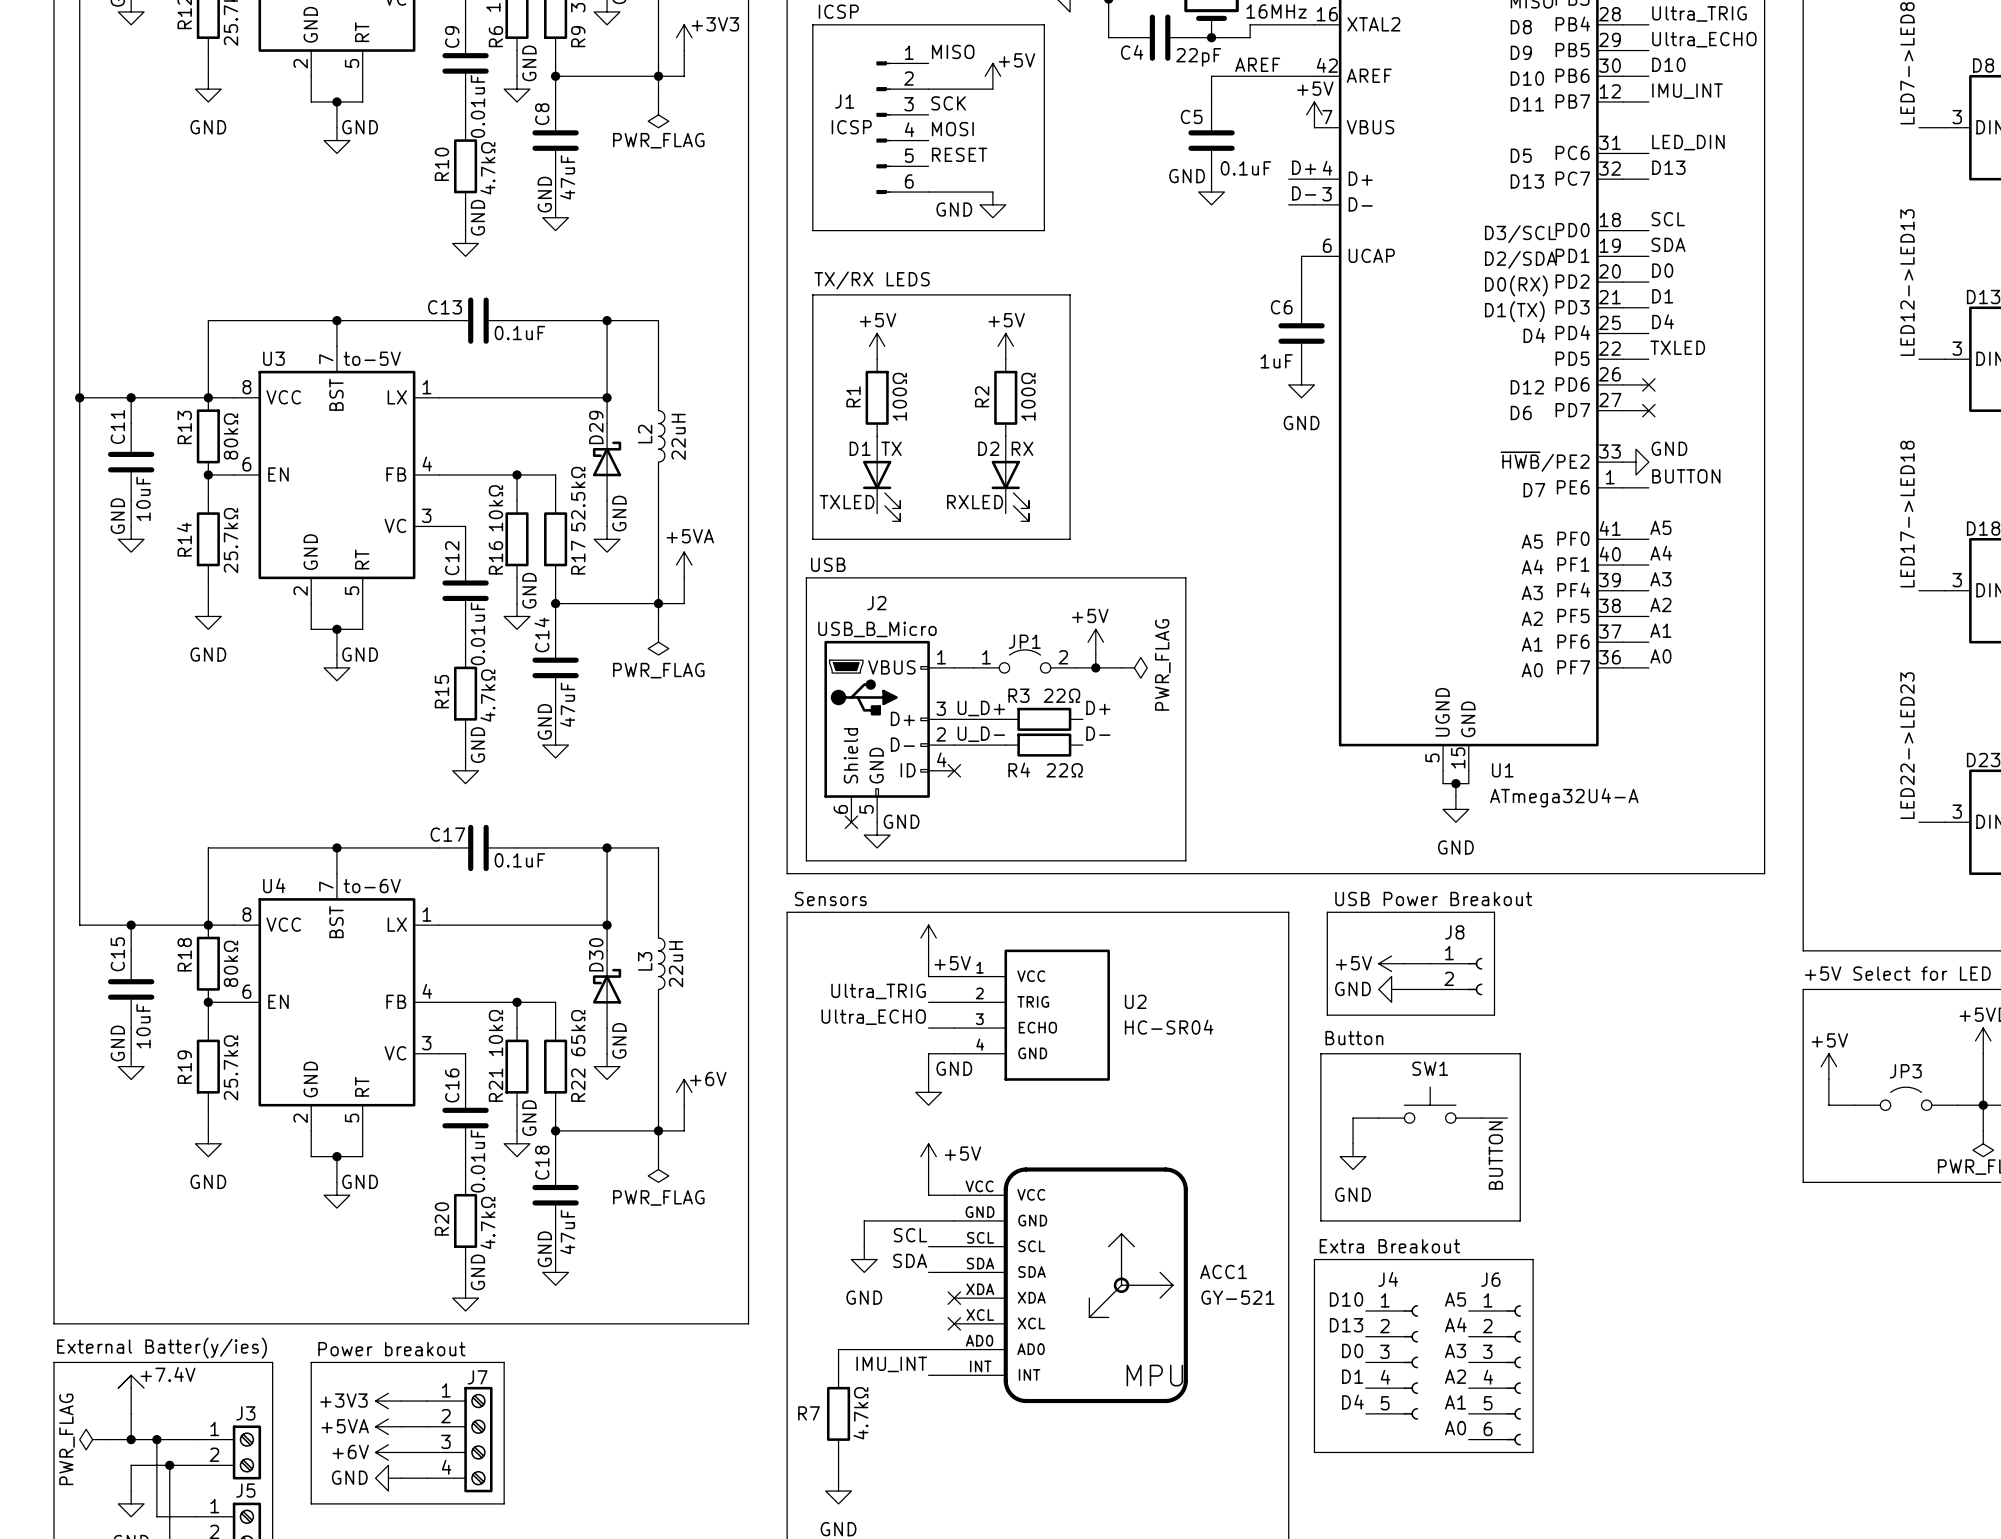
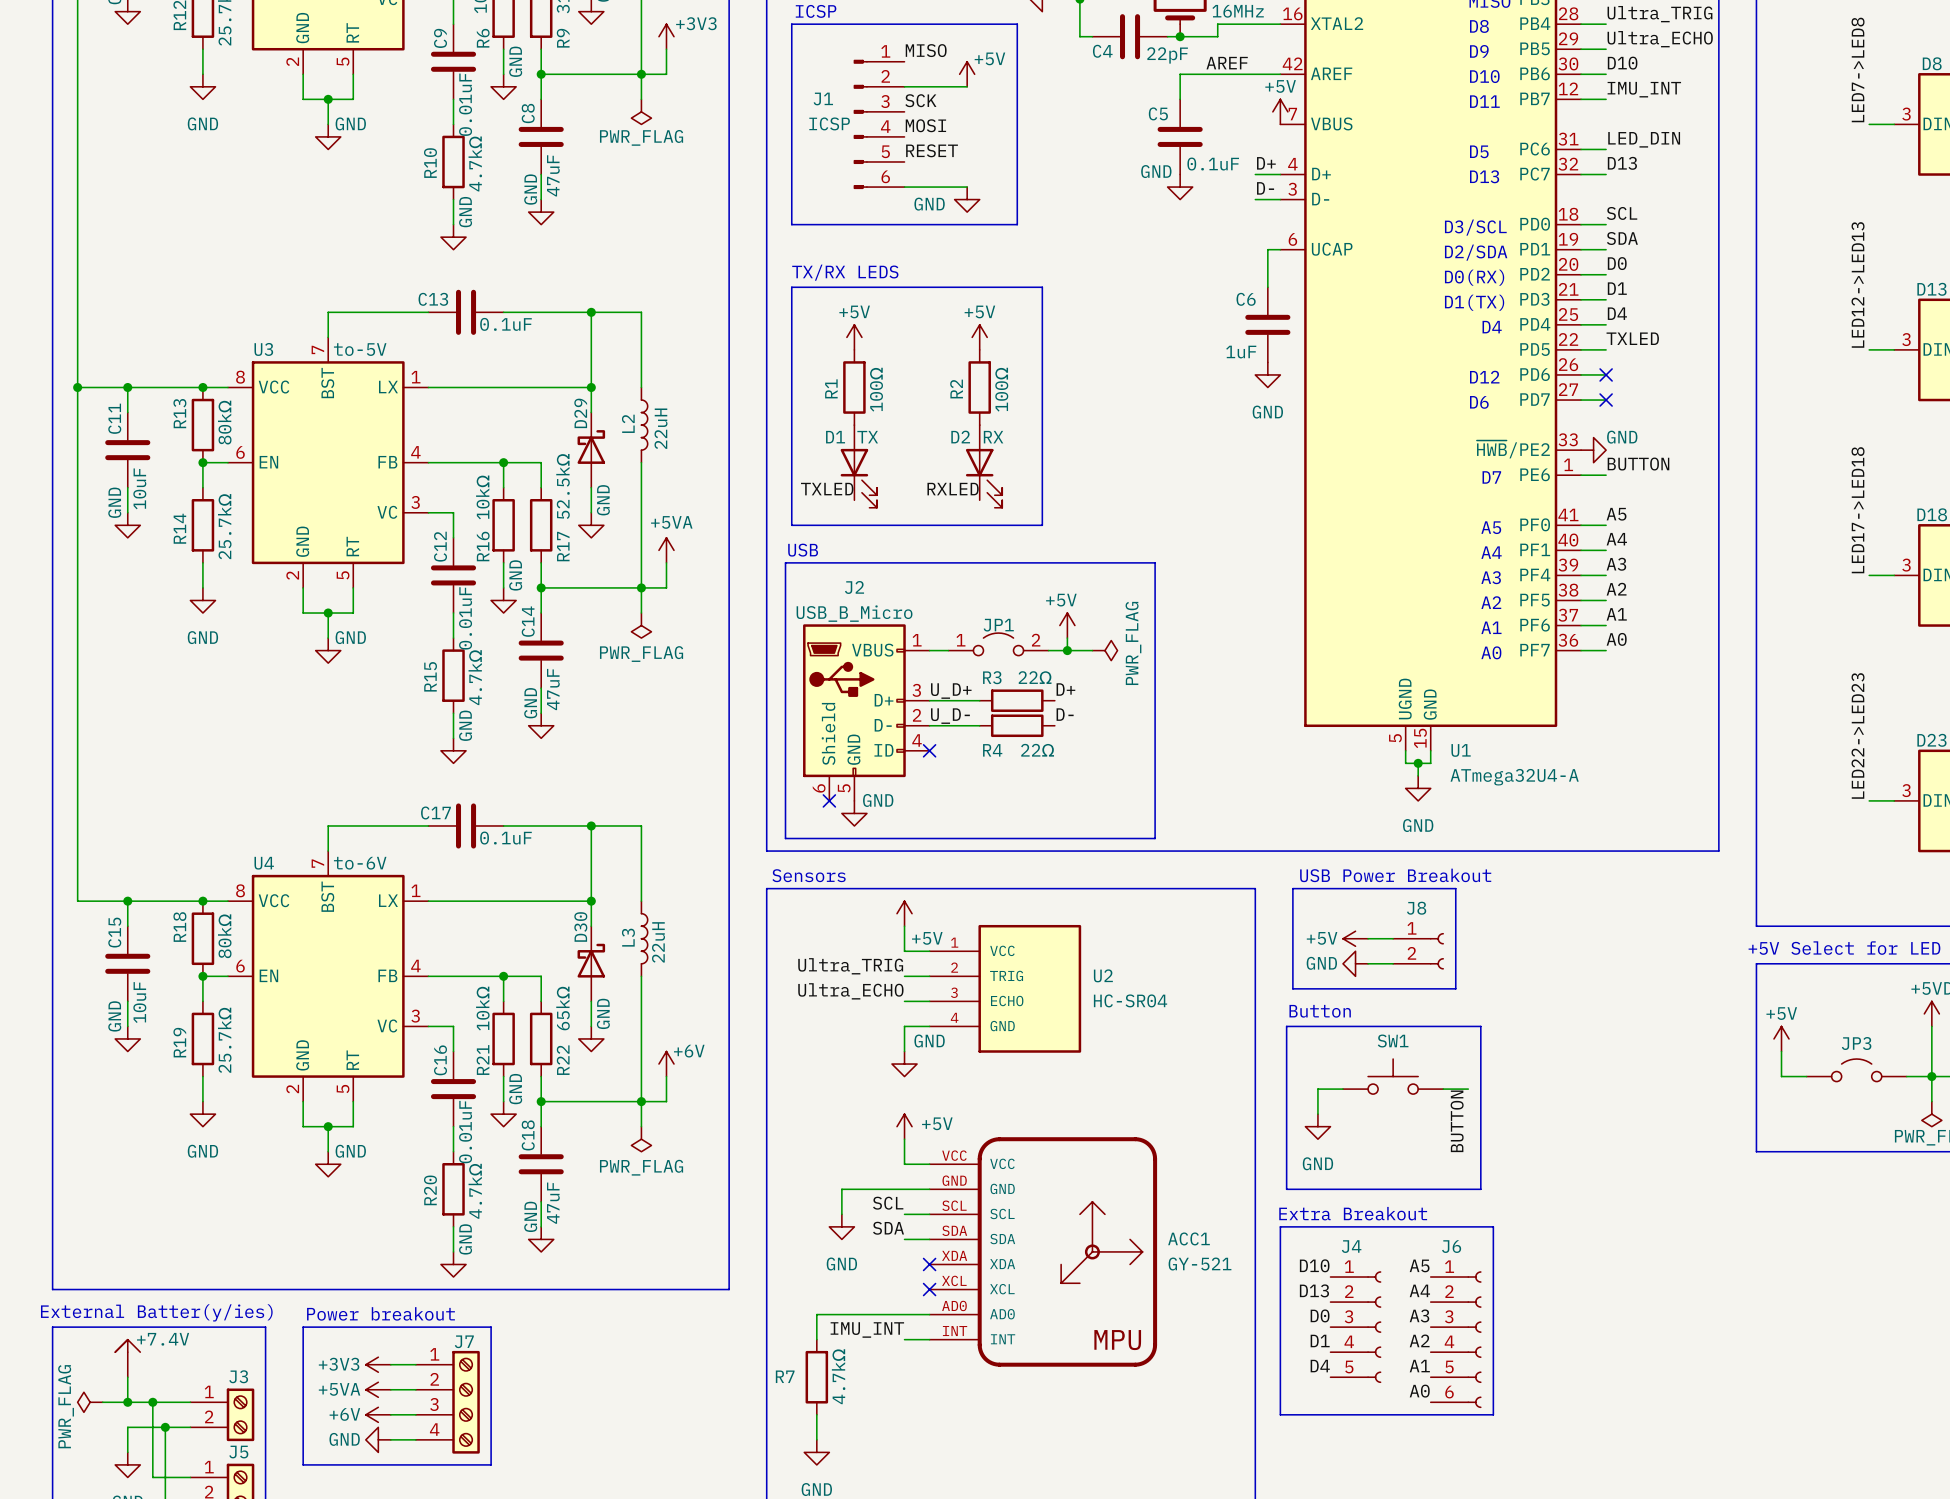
wire: (336, 320) (208, 320) (208, 397) -> none
junction: (336, 320) -> none
wire: (336, 847) (208, 847) (208, 925) -> none
junction: (336, 847) -> none

